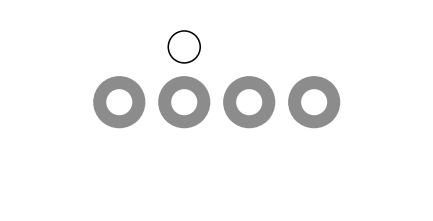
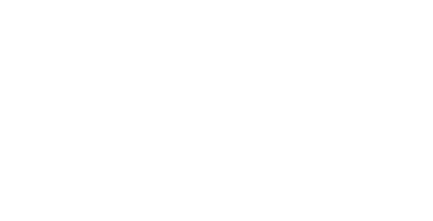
part: (216, 79) -> none

